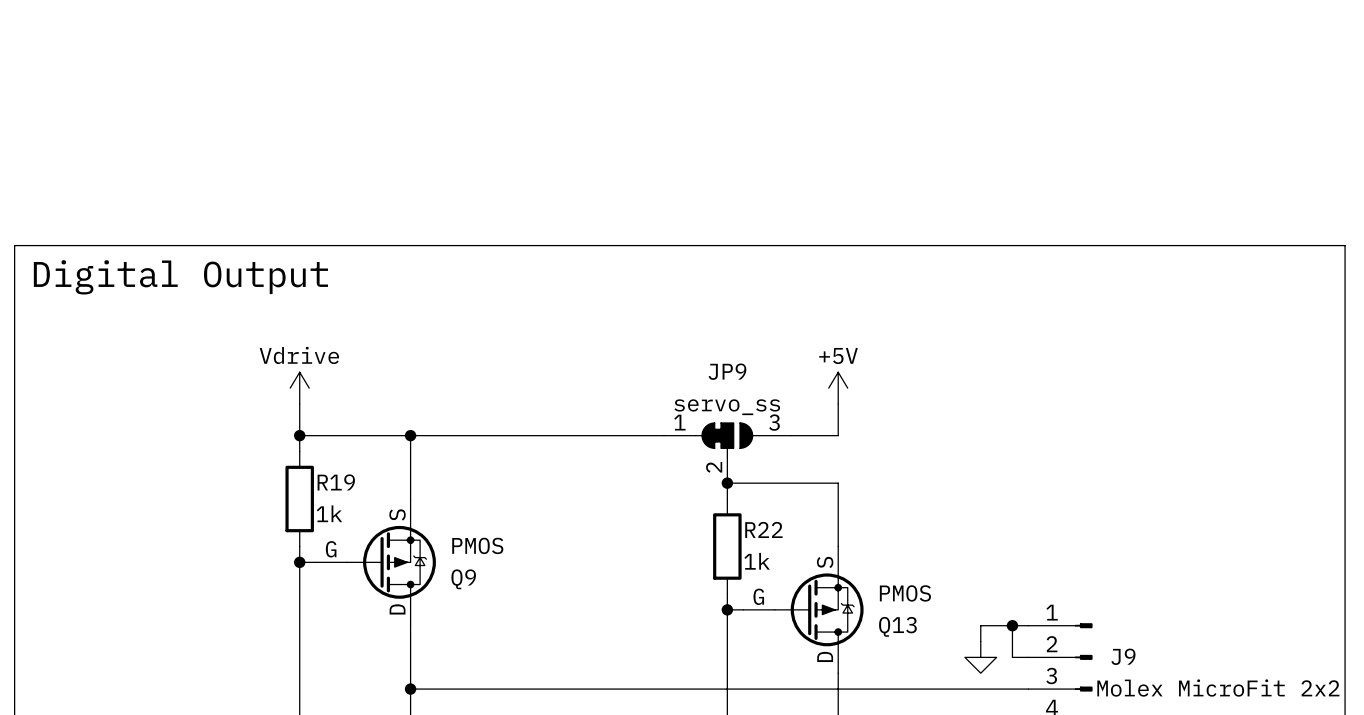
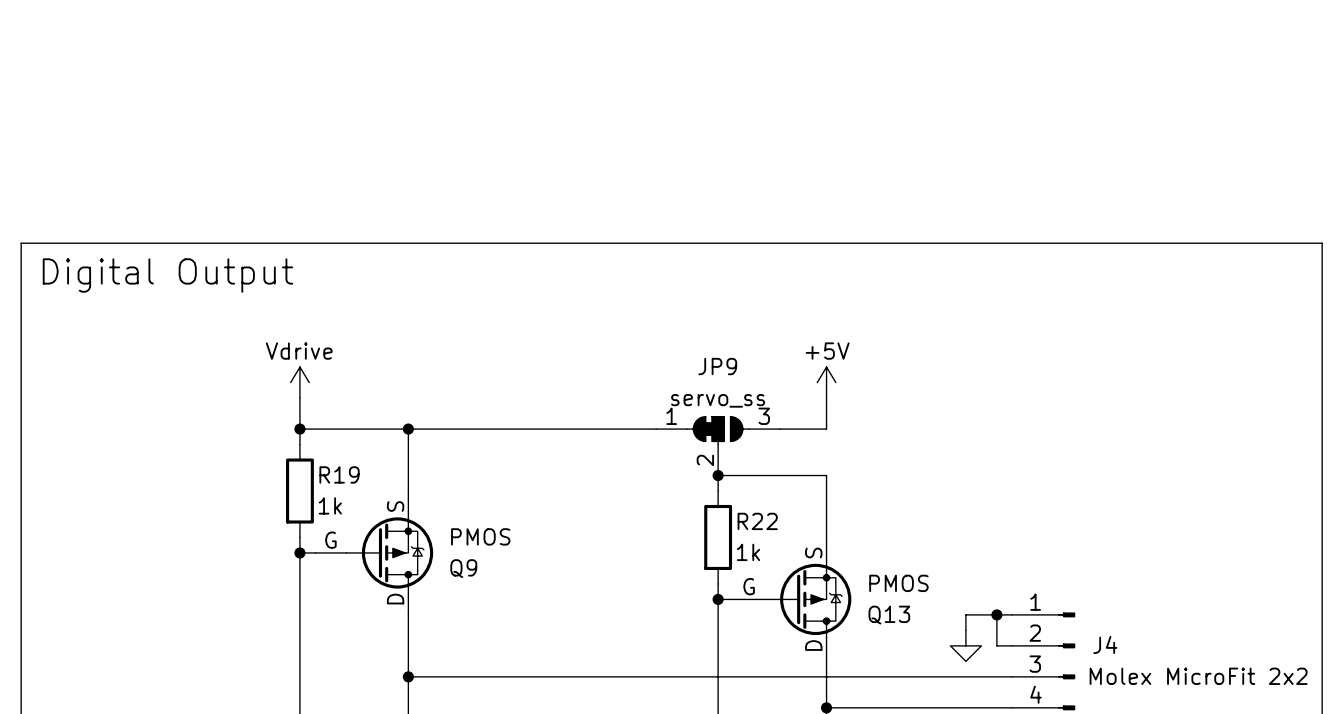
J9 name: J9 (1123, 656) -> J4 (1105, 644)

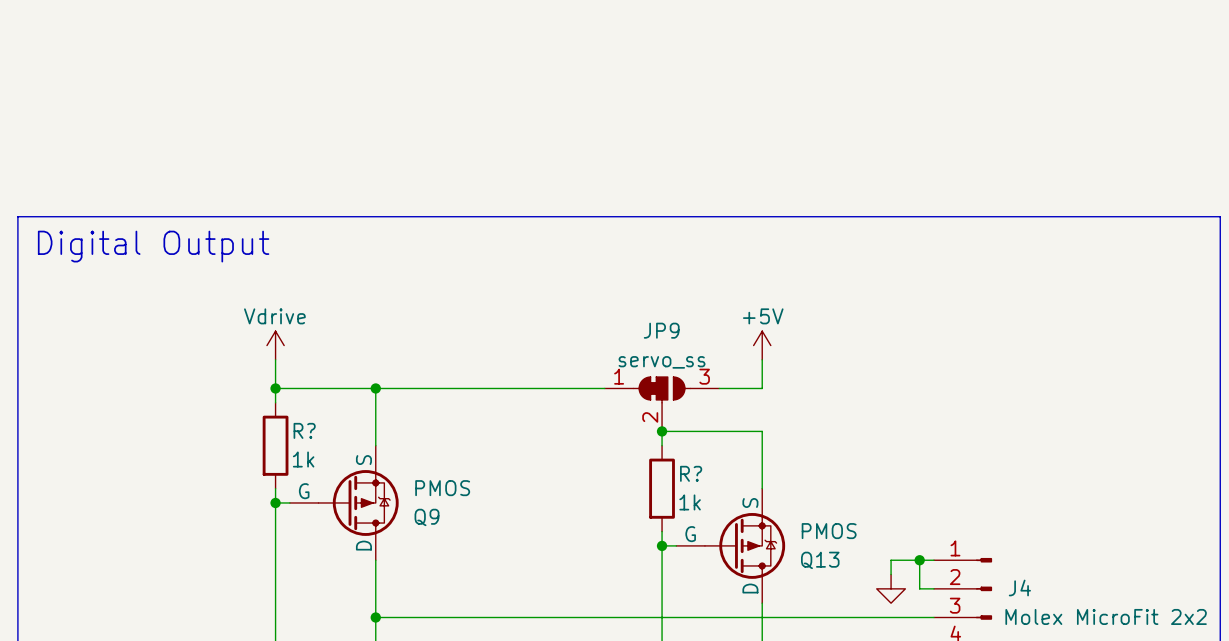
R19 name: R19 (339, 474) -> R? (304, 430)
R22 name: R22 (757, 521) -> R? (691, 473)

